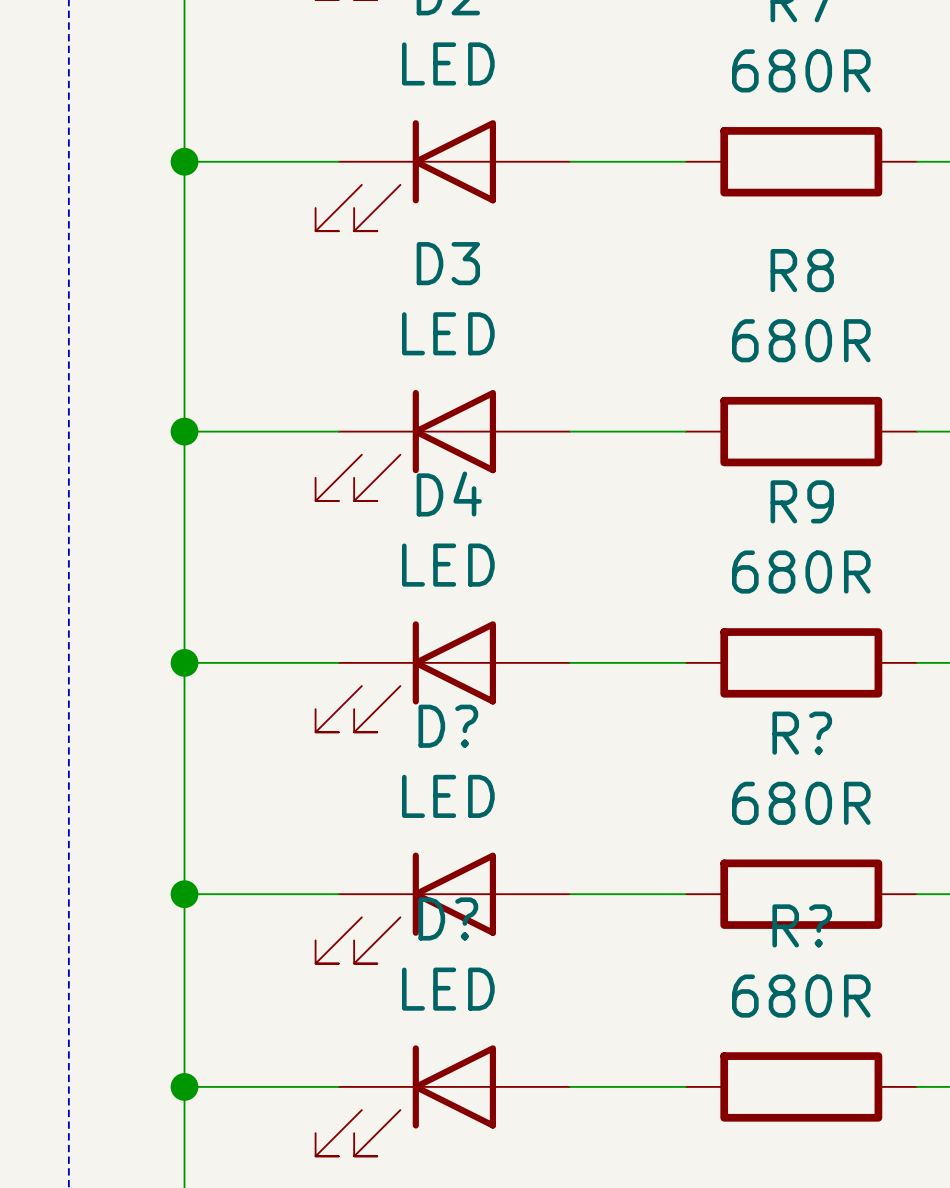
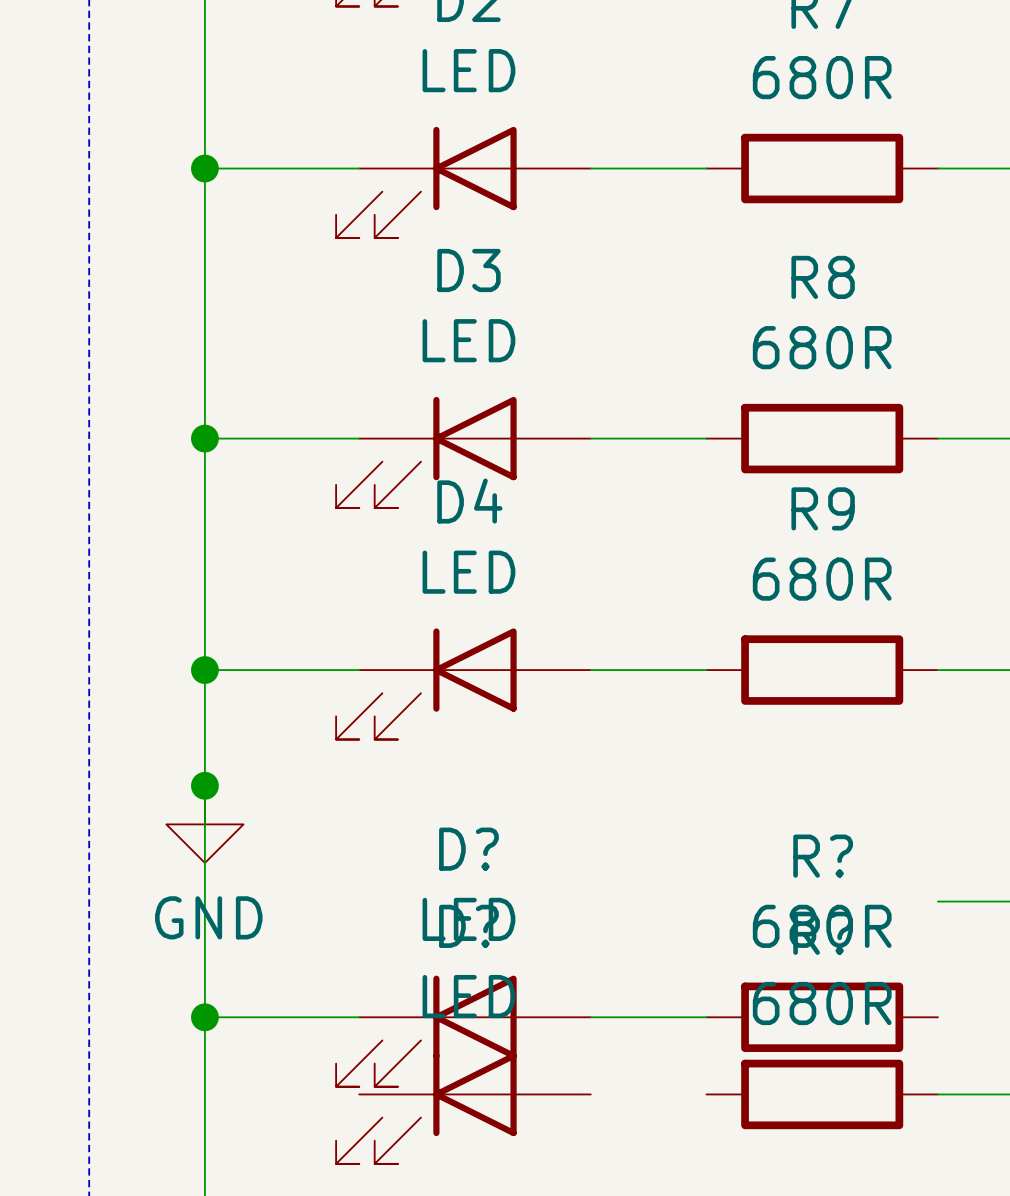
junction: none -> (204, 785)
power symbol: none -> GND (204, 824)
wire: (184, 894) (338, 894) -> none
junction: (184, 894) -> none
wire: (570, 894) (685, 894) -> none
R? position: (801, 894) -> (822, 1017)
D? position: (442, 908) -> (463, 1031)
junction: none -> (204, 1017)
wire: (184, 1086) (338, 1086) -> (204, 1017) (359, 1017)
junction: (184, 1086) -> none
wire: (570, 1086) (685, 1086) -> (590, 1017) (706, 1017)

